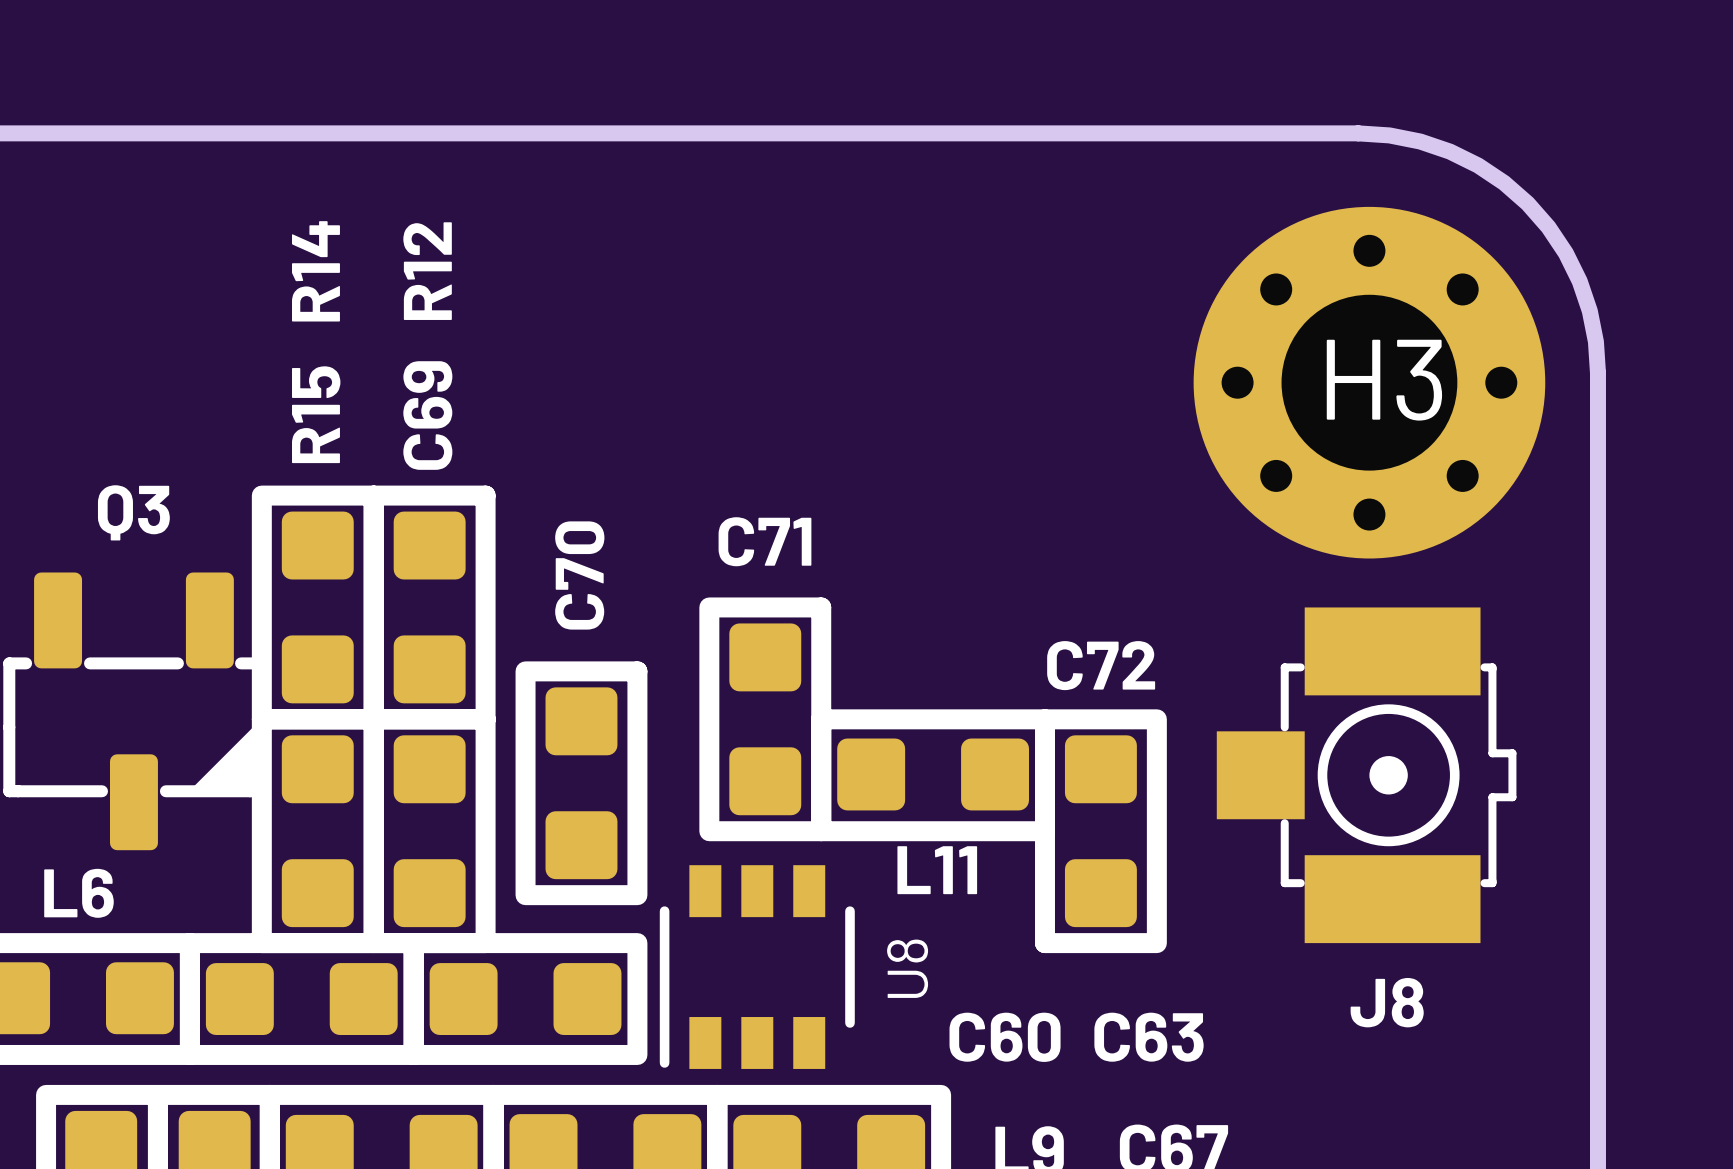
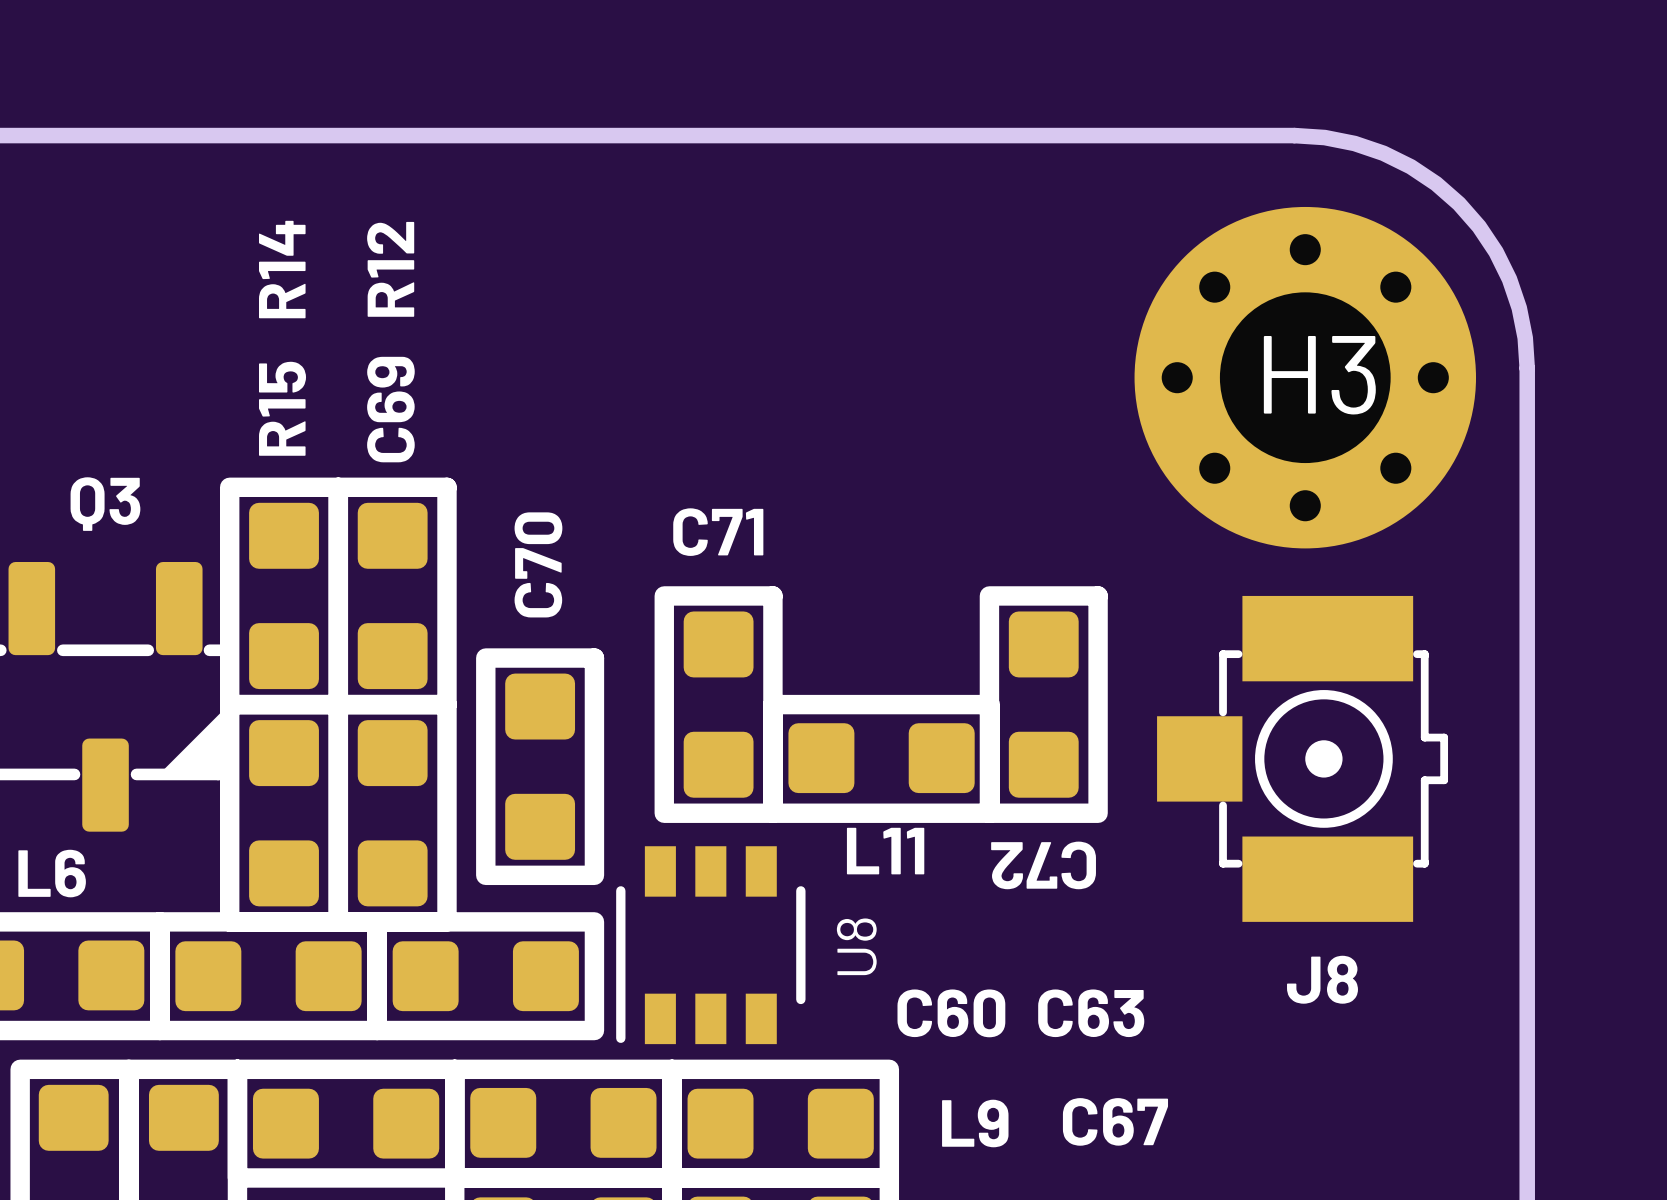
C72 name rotation: 0° (1101, 665) -> 180° (1043, 865)
C72 name position: C72 (1101, 665) -> C72 (1043, 865)
C72 position: (1100, 831) -> (1043, 704)

